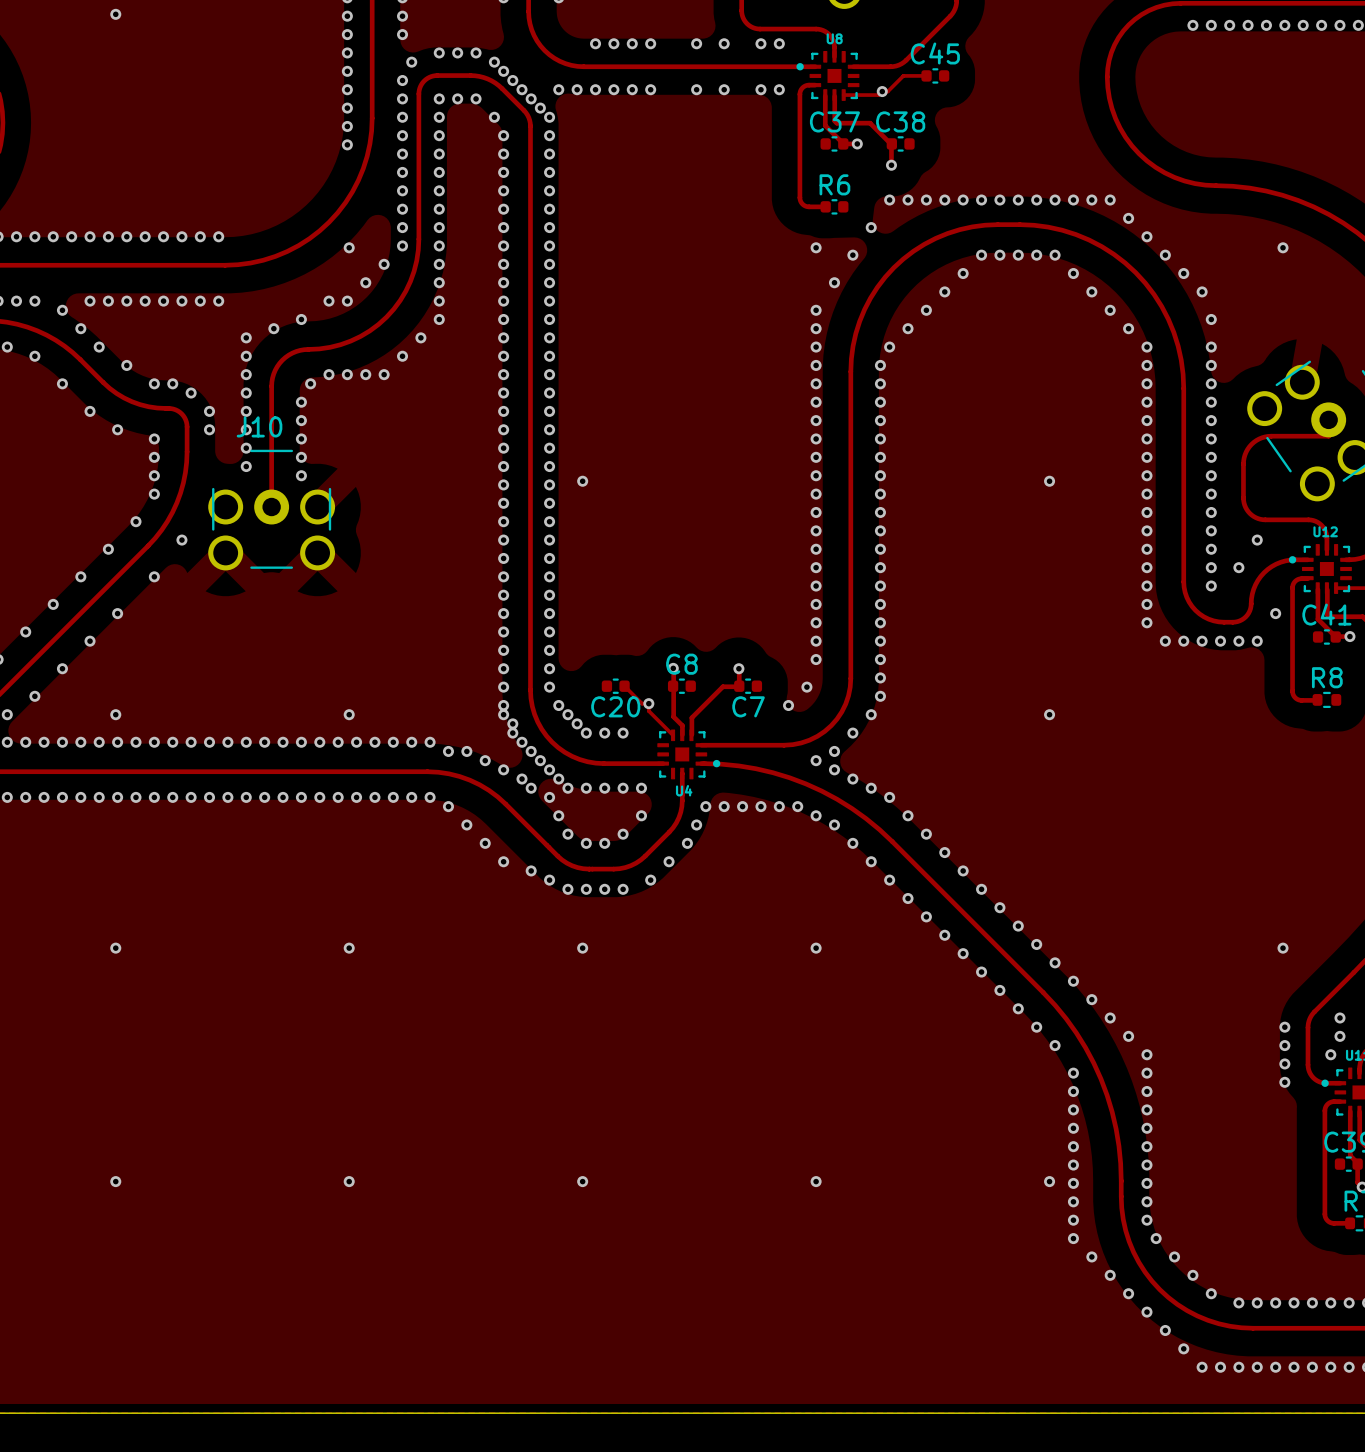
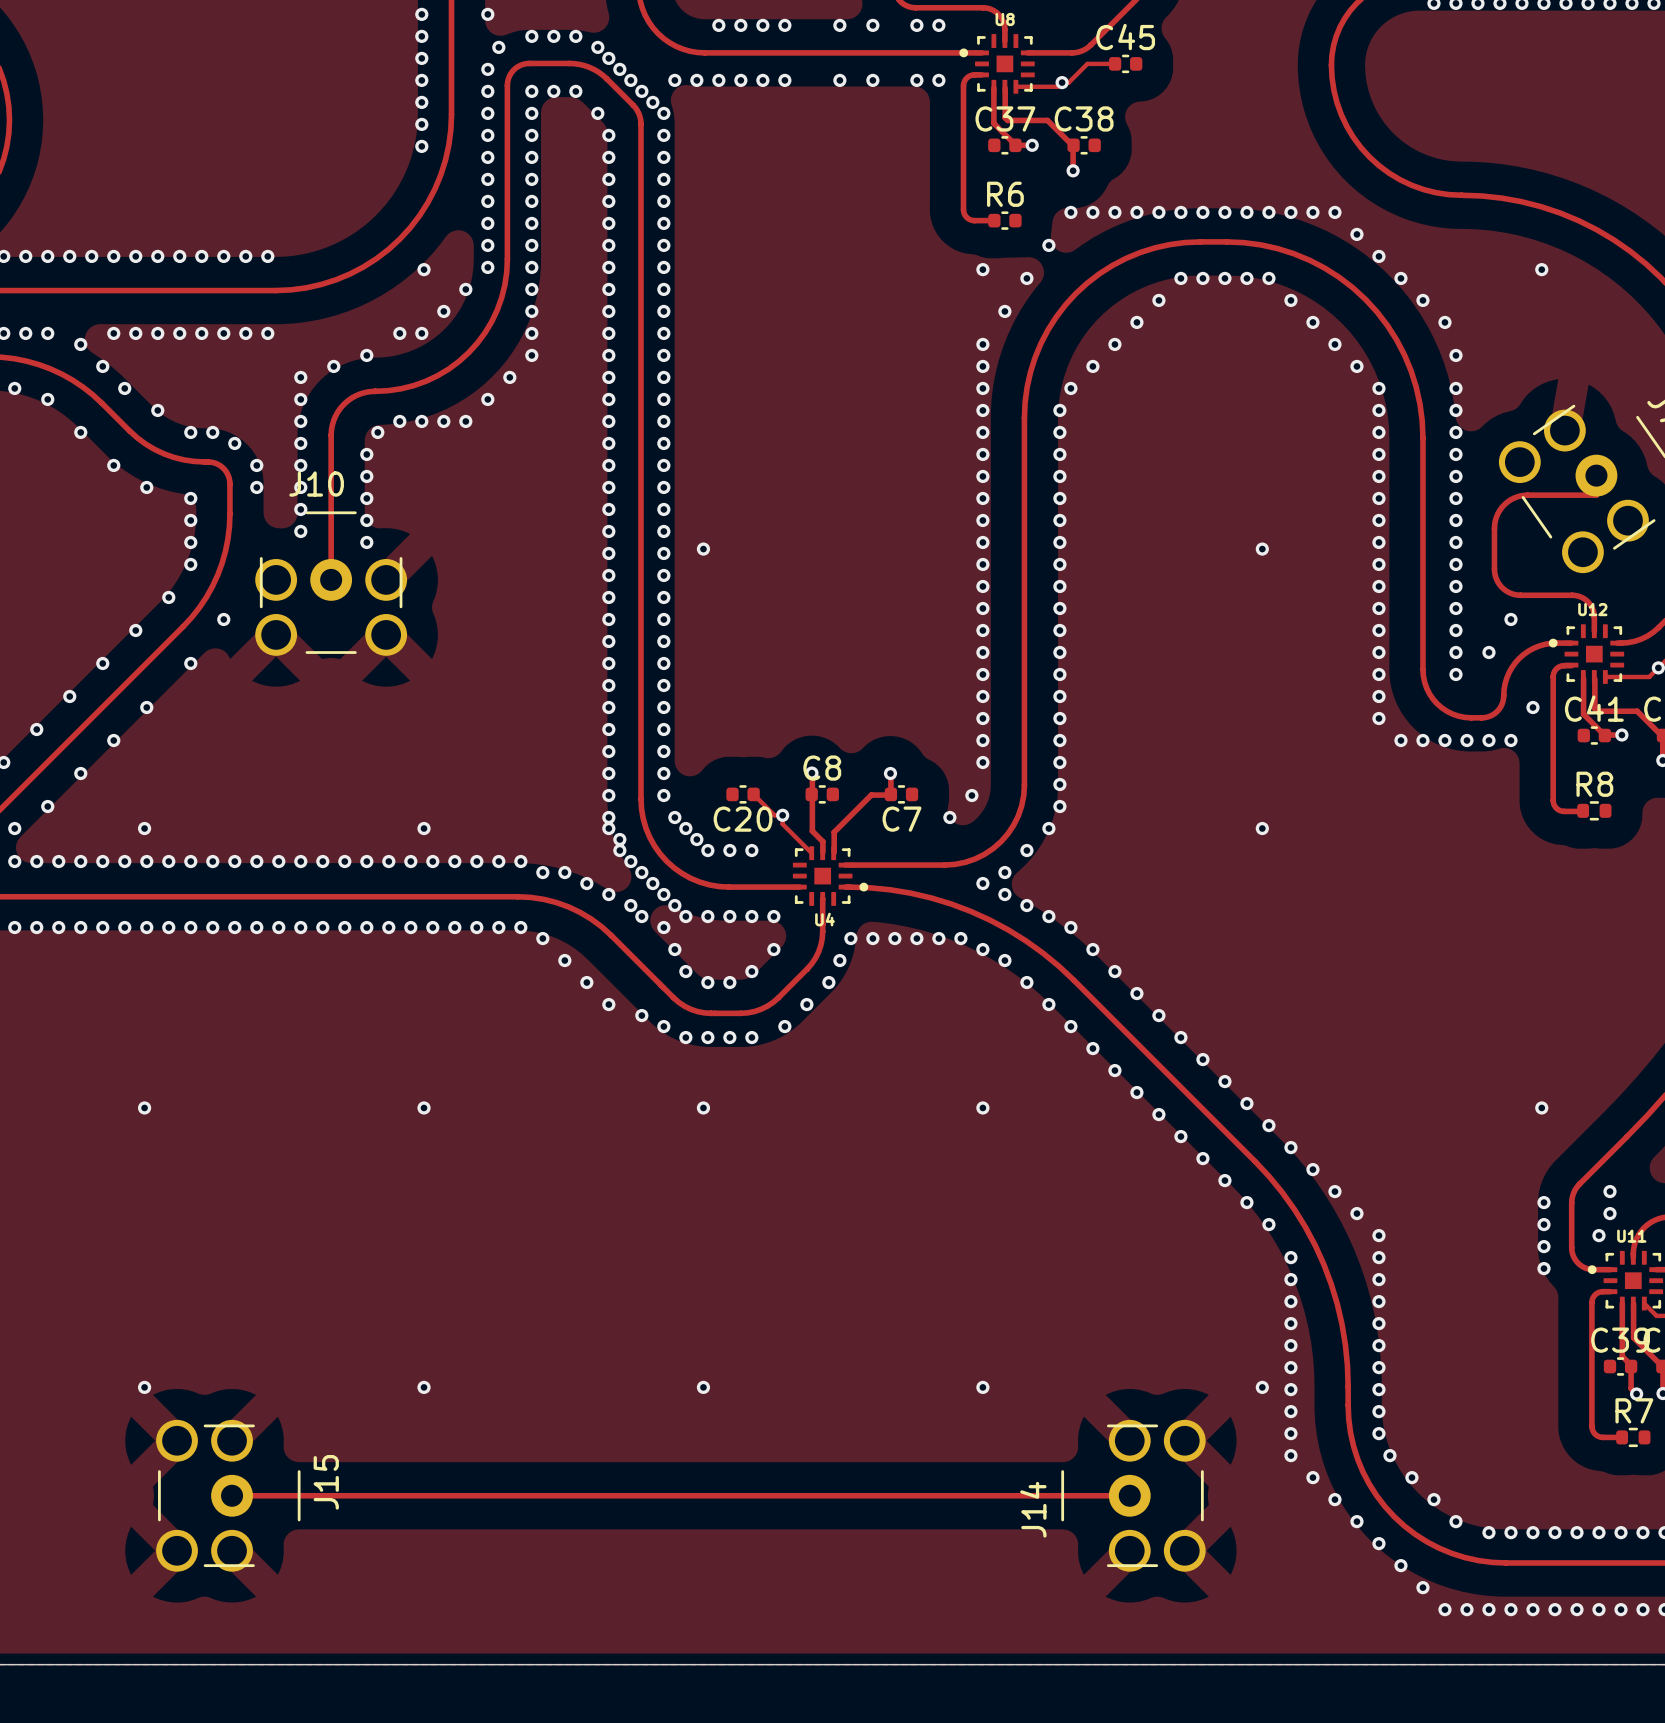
J15: none -> (228, 1495)
track: none -> (232, 1495) (1129, 1495)
J14: none -> (1133, 1495)

